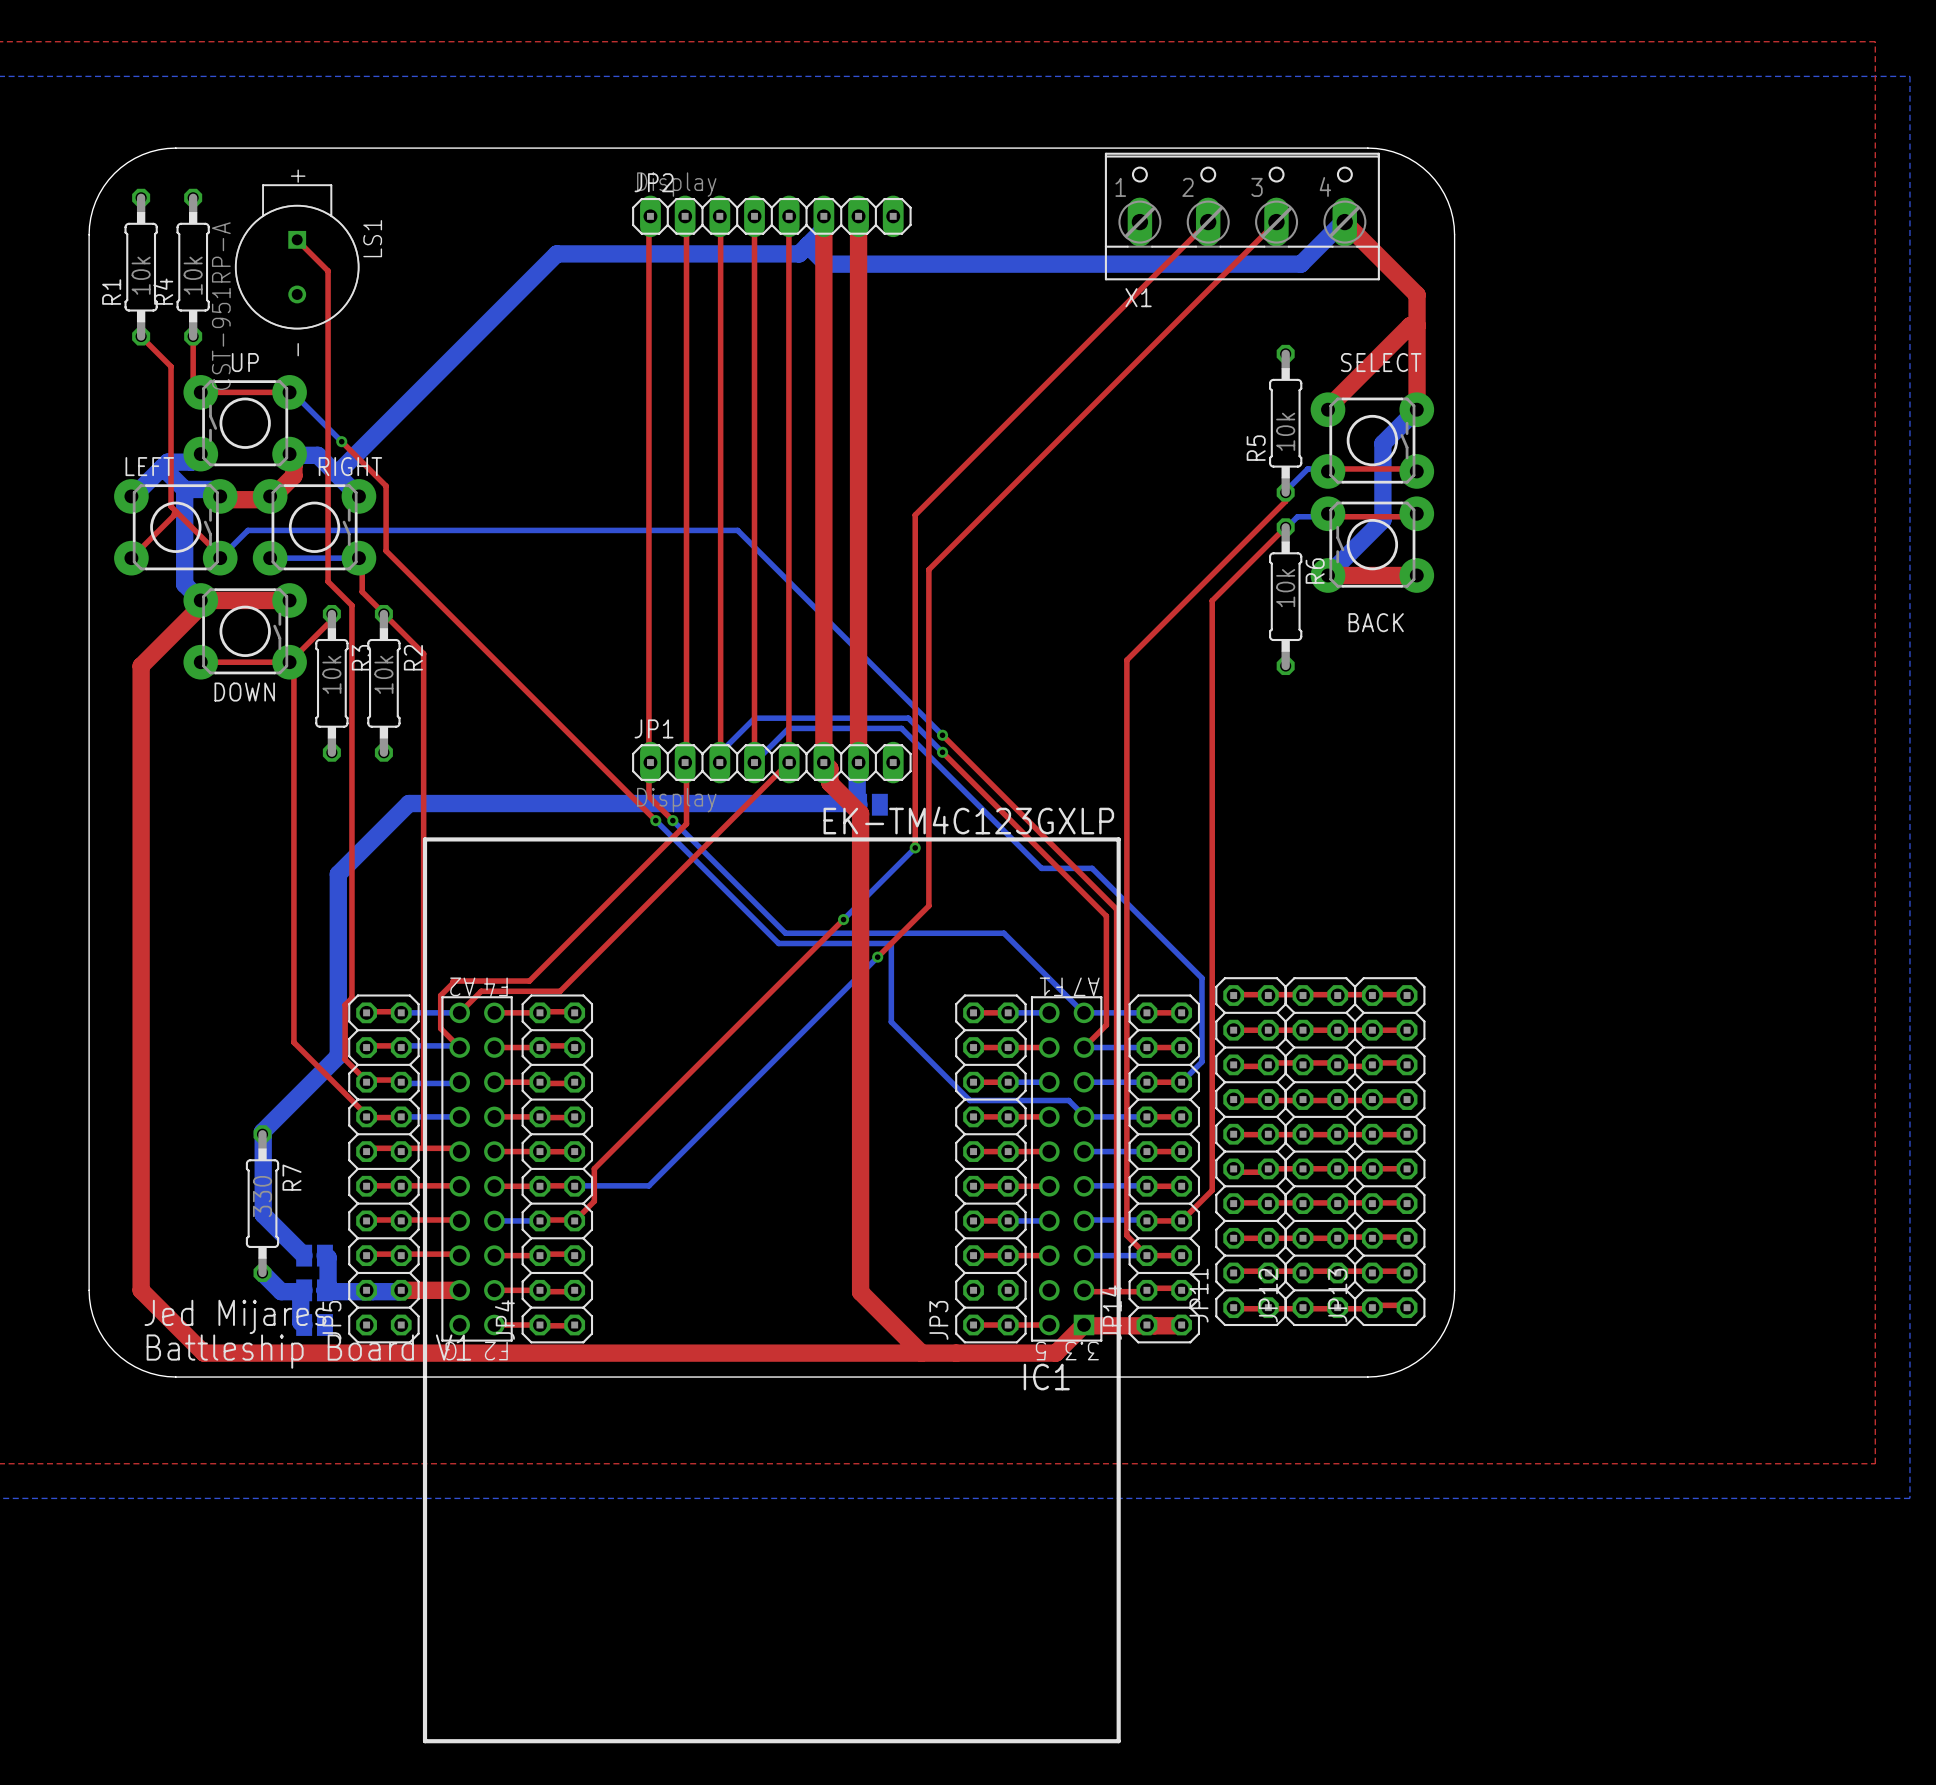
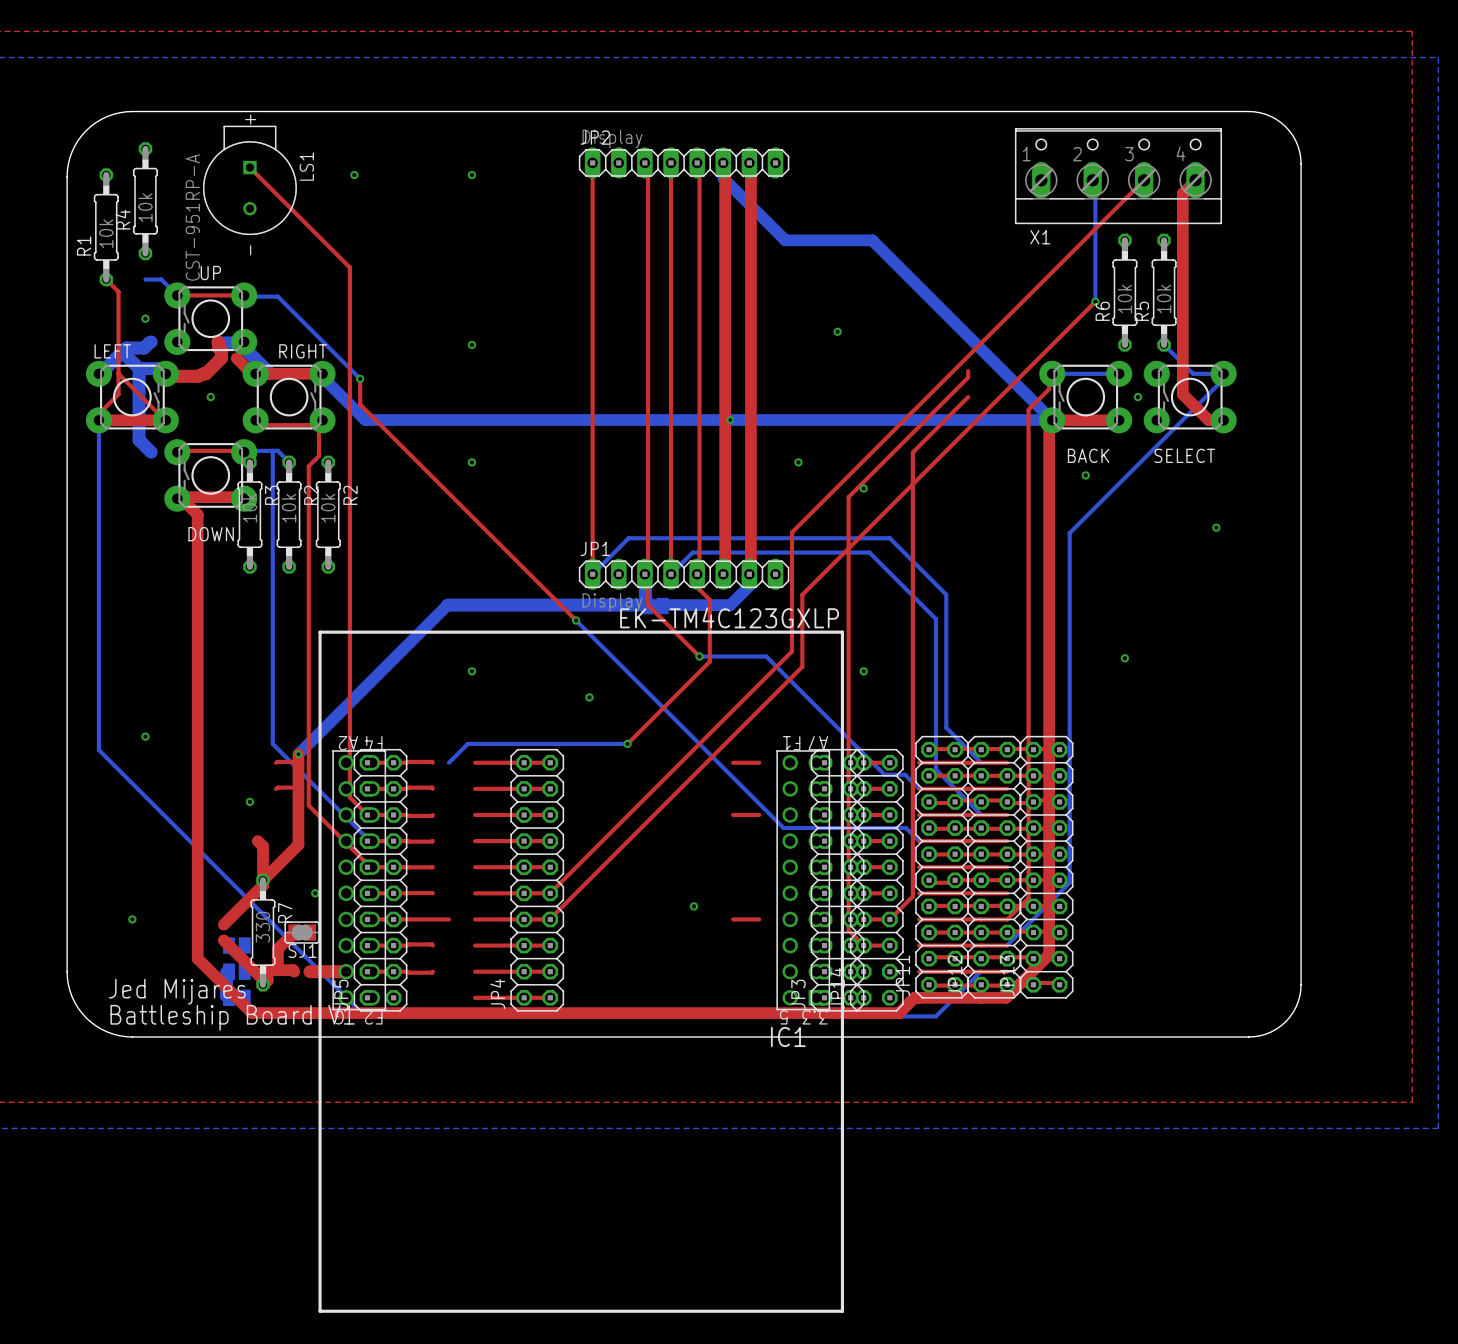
board edge: (1367, 148) (1384, 149) (1401, 154) (1416, 162) (1429, 173) (1439, 186) (1447, 201) (1452, 217) (1454, 234) (1454, 1298) (1450, 1315) (1444, 1331) (1434, 1345) (1422, 1357) (1408, 1366) (1393, 1373) (1367, 1377) -> (1030, 111) (1260, 112) (1276, 119) (1289, 131) (1298, 146) (1301, 163) (1301, 984) (1298, 1002) (1293, 1012) (1281, 1025) (1271, 1031) (1254, 1036) (1030, 1037)
top track: (650, 216) (648, 216) (648, 796) (672, 820) -> none
top track: (685, 216) (686, 824) (529, 981) (453, 981) (440, 995) (440, 1028) (459, 1047) -> none
top track: (719, 216) (719, 762) -> none
top track: (754, 216) (754, 762) -> (592, 162) (592, 574)
JP2 position: (771, 216) -> (684, 162)
top track: (789, 216) (788, 762) (560, 991) (481, 991) (459, 1012) -> none
top track: (823, 216) (823, 762) (829, 768) (829, 783) (860, 813) (860, 1292) (921, 1353) -> none
bottom track: (823, 216) (823, 230) (799, 253) (556, 253) (336, 474) -> none
top track: none -> (644, 162) (648, 166) (648, 605) (699, 656)
top track: (858, 216) (858, 762) -> (671, 162) (671, 574)
top track: none -> (723, 162) (725, 164) (725, 574) (723, 574)
top track: none -> (749, 162) (750, 162) (750, 574) (749, 574)
X1 position: (1242, 216) -> (1118, 176)
top track: none -> (249, 167) (349, 267) (349, 797) (367, 814) (372, 814)
top track: (1208, 222) (915, 515) (915, 847) -> none
top track: (1276, 222) (928, 569) -> (697, 162) (699, 165) (699, 428)
top track: (1344, 222) (1417, 294) (1416, 409) -> none
bottom track: (1344, 222) (1300, 264) (826, 264) (807, 245) -> none
via: none -> (354, 175)
via: none -> (471, 175)
bottom track: none -> (723, 178) (785, 240) (872, 240) (1052, 420)
bottom track: none -> (1092, 180) (1095, 183) (1095, 301)
top track: none -> (1144, 180) (792, 532) (792, 651) (550, 893)
top track: none -> (1195, 180) (1182, 193) (1182, 394) (1208, 420) (1223, 420)
top track: (297, 240) (328, 270) (328, 581) (351, 605) (351, 998) (345, 1004) (345, 1059) (366, 1082) (369, 1080) (399, 1080) (401, 1082) -> none
LS1 position: (297, 256) -> (249, 180)
R1 position: (141, 267) -> (106, 227)
top track: (1417, 325) (1410, 325) (1327, 409) -> none
top track: (141, 336) (171, 366) (171, 506) (218, 554) (218, 557) -> (118, 373) (164, 420)
top track: (193, 336) (193, 384) (200, 392) (235, 392) -> none
top track: none -> (106, 279) (118, 291) (118, 394) (103, 409) (103, 420) (98, 420) (165, 420)
bottom track: none -> (145, 279) (161, 279) (177, 295)
top track: none -> (218, 295) (244, 295)
bottom track: (289, 392) (293, 393) (341, 441) -> none
bottom track: none -> (244, 295) (277, 296) (360, 378)
top track: none -> (1095, 301) (802, 594) (802, 666) (550, 919) (475, 919)
via: none -> (1095, 301)
bottom track: (1416, 409) (1382, 443) (1382, 520) (1327, 575) -> none
via: none -> (145, 318)
UP position: (245, 423) -> (210, 318)
R5 position: (1285, 423) -> (1164, 292)
via: none -> (837, 331)
SELECT rotation: 0° (1372, 440) -> 180° (1190, 397)
SELECT position: (1372, 440) -> (1190, 397)
top track: (341, 441) (386, 486) (386, 550) (655, 820) -> none
via: (341, 441) -> none
via: none -> (471, 344)
bottom track: none -> (1164, 344) (1193, 373) (1223, 373) (1223, 379) (1069, 533) (1069, 882) (1007, 945)
RIGHT name position: RIGHT (350, 466) -> RIGHT (303, 351)
top track: (1327, 471) (1328, 468) (1413, 468) (1416, 471) -> none
bottom track: (1327, 471) (1324, 468) (1307, 468) (1285, 492) -> none
top track: none -> (236, 358) (252, 373) (322, 373)
bottom track: none -> (322, 373) (324, 378) (365, 420) (1051, 420)
top track: none -> (1052, 373) (1049, 378) (1049, 389) (1028, 409) (1028, 898) (1007, 919) (919, 919)
bottom track: none -> (1052, 373) (1119, 373)
top track: none -> (360, 378) (360, 404) (576, 620)
via: none -> (360, 378)
top track: (176, 511) (131, 558) -> none
top track: (1327, 513) (1328, 516) (1413, 516) (1416, 513) -> none
bottom track: (1327, 513) (1324, 516) (1297, 516) (1285, 527) -> none
via: none -> (210, 397)
RIGHT position: (314, 527) -> (289, 397)
via: none -> (1137, 397)
BACK position: (1372, 544) -> (1085, 397)
via: none -> (730, 420)
bottom track: none -> (98, 420) (98, 750) (365, 1016) (936, 1016) (981, 971)
bottom track: (220, 558) (247, 530) (737, 530) (942, 735) -> none
bottom track: (270, 558) (358, 558) -> none
top track: none -> (255, 420) (257, 425) (319, 425)
top track: (358, 558) (362, 561) (362, 591) (423, 653) (423, 1148) -> none
top track: none -> (1119, 420) (1052, 420) (1049, 423) (1049, 954) (1006, 997) (914, 997) (899, 1013) (252, 1013) (197, 958) (197, 514) (180, 497) (244, 498)
top track: none -> (319, 425) (319, 456) (308, 466) (308, 805) (367, 864) (367, 867) (372, 867)
R6 name position: R6 (1315, 571) -> R6 (1102, 311)
top track: (1327, 575) (1416, 575) -> none
R6 value position: 10k (1285, 588) -> 10k (1124, 299)
R6 position: (1285, 596) -> (1124, 292)
bottom track: none -> (272, 450) (272, 743) (365, 836) (367, 841)
top track: none -> (177, 452) (244, 452)
top track: (289, 600) (200, 600) (200, 606) (141, 666) (141, 1290) (203, 1353) (1055, 1353) (1083, 1325) (1181, 1325) -> none
bottom track: none -> (244, 452) (277, 450) (289, 462)
top track: (331, 613) (331, 619) (289, 662) -> none
via: none -> (471, 462)
via: none -> (798, 462)
DOWN rotation: 0° (245, 631) -> 180° (210, 475)
via: none -> (1085, 475)
via: none -> (863, 488)
top track: (200, 662) (289, 662) -> none
top track: (289, 662) (293, 666) (293, 1042) (366, 1116) (401, 1116) -> none
R2: none -> 10k (328, 514)
via: none -> (1216, 527)
top track: (942, 735) (1116, 909) (1116, 1291) -> none
via: (942, 735) -> none
top track: (942, 752) (1106, 916) (1106, 1025) (1083, 1047) -> none
bottom track: (942, 752) (908, 718) (754, 718) (720, 752) (719, 762) -> none
via: (942, 752) -> none
bottom track: (754, 762) (788, 728) (901, 728) (1041, 868) (1092, 868) (1201, 978) (1201, 1061) (1181, 1082) -> none
JP1 position: (771, 762) -> (684, 574)
bottom track: none -> (592, 574) (628, 538) (889, 538) (946, 594) (946, 727) (981, 762)
bottom track: none -> (671, 574) (692, 552) (869, 552) (936, 619) (936, 769) (981, 814)
bottom track: none -> (749, 574) (750, 574) (750, 584) (730, 605) (645, 605)
top track: (928, 783) (928, 905) (877, 957) -> (699, 589) (709, 599) (709, 661) (627, 743)
bottom track: (594, 803) (408, 803) (338, 874) (338, 1056) (262, 1131) (263, 1214) (304, 1255) -> (447, 605) (298, 754)
bottom track: (655, 820) (778, 943) (891, 943) (891, 1022) (969, 1100) (1068, 1100) (1083, 1116) (1146, 1116) -> none
via: (655, 820) -> none
bottom track: (672, 820) (785, 933) (1003, 933) (1083, 1012) (1146, 1012) -> none
via: (672, 820) -> none
bottom track: none -> (576, 620) (783, 828) (906, 828) (919, 841)
via: none -> (576, 620)
bottom track: (915, 847) (843, 919) -> none
via position: (915, 847) -> (699, 656)
bottom track: none -> (699, 656) (766, 656) (884, 774) (905, 774) (919, 788)
via: none -> (1124, 658)
via: none -> (471, 671)
via: none -> (863, 671)
top track: (843, 919) (594, 1168) (594, 1201) (574, 1220) (539, 1220) -> none
via: (843, 919) -> none
via: none -> (589, 697)
bottom track: (877, 957) (648, 1185) (574, 1186) -> none
via: (877, 957) -> none
via: none -> (145, 736)
bottom track: none -> (627, 743) (467, 743) (449, 762)
via: none -> (627, 743)
top track: none -> (298, 754) (298, 844) (262, 880)
via: none -> (298, 754)
bottom track: (401, 1012) (459, 1012) -> none
top track: none -> (475, 762) (550, 762)
bottom track: (1008, 1012) (1049, 1012) -> none
top track: none -> (919, 762) (1007, 762)
bottom track: (401, 1047) (403, 1045) (457, 1045) (459, 1047) -> none
top track: none -> (475, 788) (550, 788)
top track: (973, 1047) (1049, 1047) -> none
bottom track: (1083, 1047) (1146, 1047) -> none
top track: none -> (919, 788) (1007, 788)
via: none -> (249, 801)
bottom track: (401, 1082) (459, 1082) -> none
top track: none -> (475, 814) (550, 814)
bottom track: (1008, 1082) (1049, 1082) -> none
bottom track: (1083, 1082) (1146, 1082) -> none
top track: none -> (919, 814) (1007, 814)
top track: none -> (257, 841) (262, 846) (262, 885) (223, 924)
bottom track: (401, 1116) (459, 1116) -> none
top track: none -> (475, 841) (550, 841)
top track: (973, 1116) (1049, 1116) -> none
top track: none -> (919, 841) (1007, 841)
top track: (366, 1151) (369, 1148) (399, 1148) (401, 1151) (403, 1148) (457, 1148) (459, 1151) -> none
top track: none -> (475, 867) (550, 867)
top track: (973, 1151) (1049, 1151) -> none
bottom track: (1083, 1151) (1146, 1151) -> none
top track: none -> (919, 867) (1007, 867)
JP5 position: (383, 1168) -> (380, 880)
JP4 position: (557, 1168) -> (537, 880)
JP3 position: (990, 1168) -> (837, 880)
top track: (366, 1186) (459, 1186) -> none
via: none -> (315, 893)
top track: none -> (475, 893) (550, 893)
top track: (973, 1186) (1049, 1186) -> none
bottom track: (1083, 1186) (1146, 1186) -> none
top track: none -> (919, 893) (1007, 893)
R7 position: (262, 1203) -> (262, 932)
via: none -> (693, 906)
via: none -> (132, 919)
top track: (366, 1220) (459, 1220) -> none
top track: none -> (367, 919) (449, 919)
bottom track: (494, 1220) (539, 1220) -> none
bottom track: (1008, 1220) (1049, 1220) -> none
bottom track: (1083, 1220) (1146, 1220) -> none
top track: none -> (294, 932) (277, 948) (277, 970)
SJ1: none -> (302, 932)
top track: none -> (223, 940) (262, 979) (262, 984) (267, 980) (267, 970) (294, 971)
bottom track: (324, 1255) (328, 1257) (328, 1284) (324, 1290) (401, 1290) -> none
top track: (366, 1255) (369, 1254) (459, 1255) -> none
top track: none -> (475, 945) (550, 945)
top track: (973, 1255) (1049, 1255) -> none
bottom track: (1083, 1255) (1146, 1255) -> none
top track: none -> (919, 945) (1007, 945)
bottom track: (262, 1272) (281, 1291) (304, 1290) -> none
top track: none -> (475, 971) (550, 971)
top track: (1083, 1290) (1143, 1291) (1147, 1288) (1181, 1288) (1181, 1290) -> none
top track: none -> (919, 971) (1007, 971)
top track: (494, 1325) (574, 1325) -> none
top track: none -> (475, 997) (550, 997)
top track: (973, 1325) (1049, 1325) -> none

